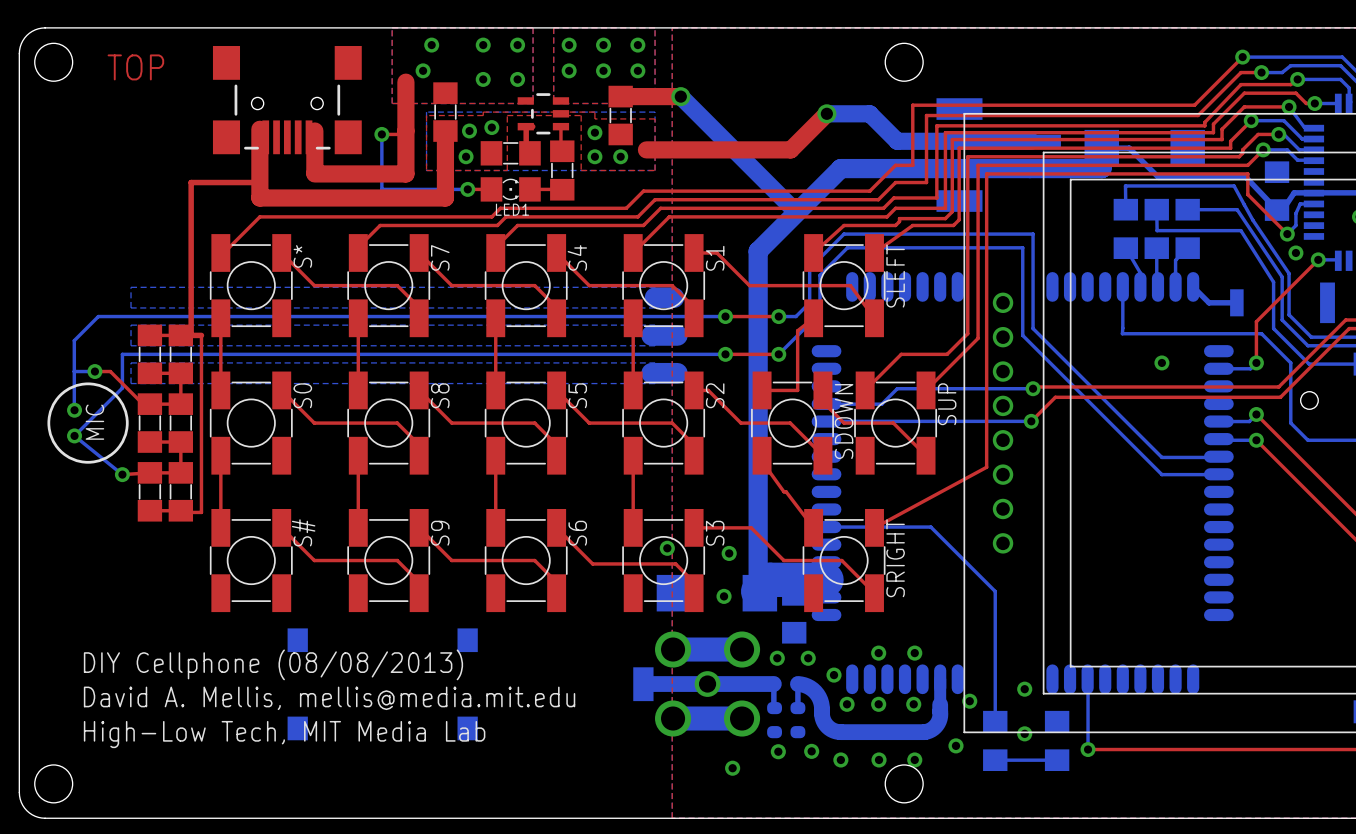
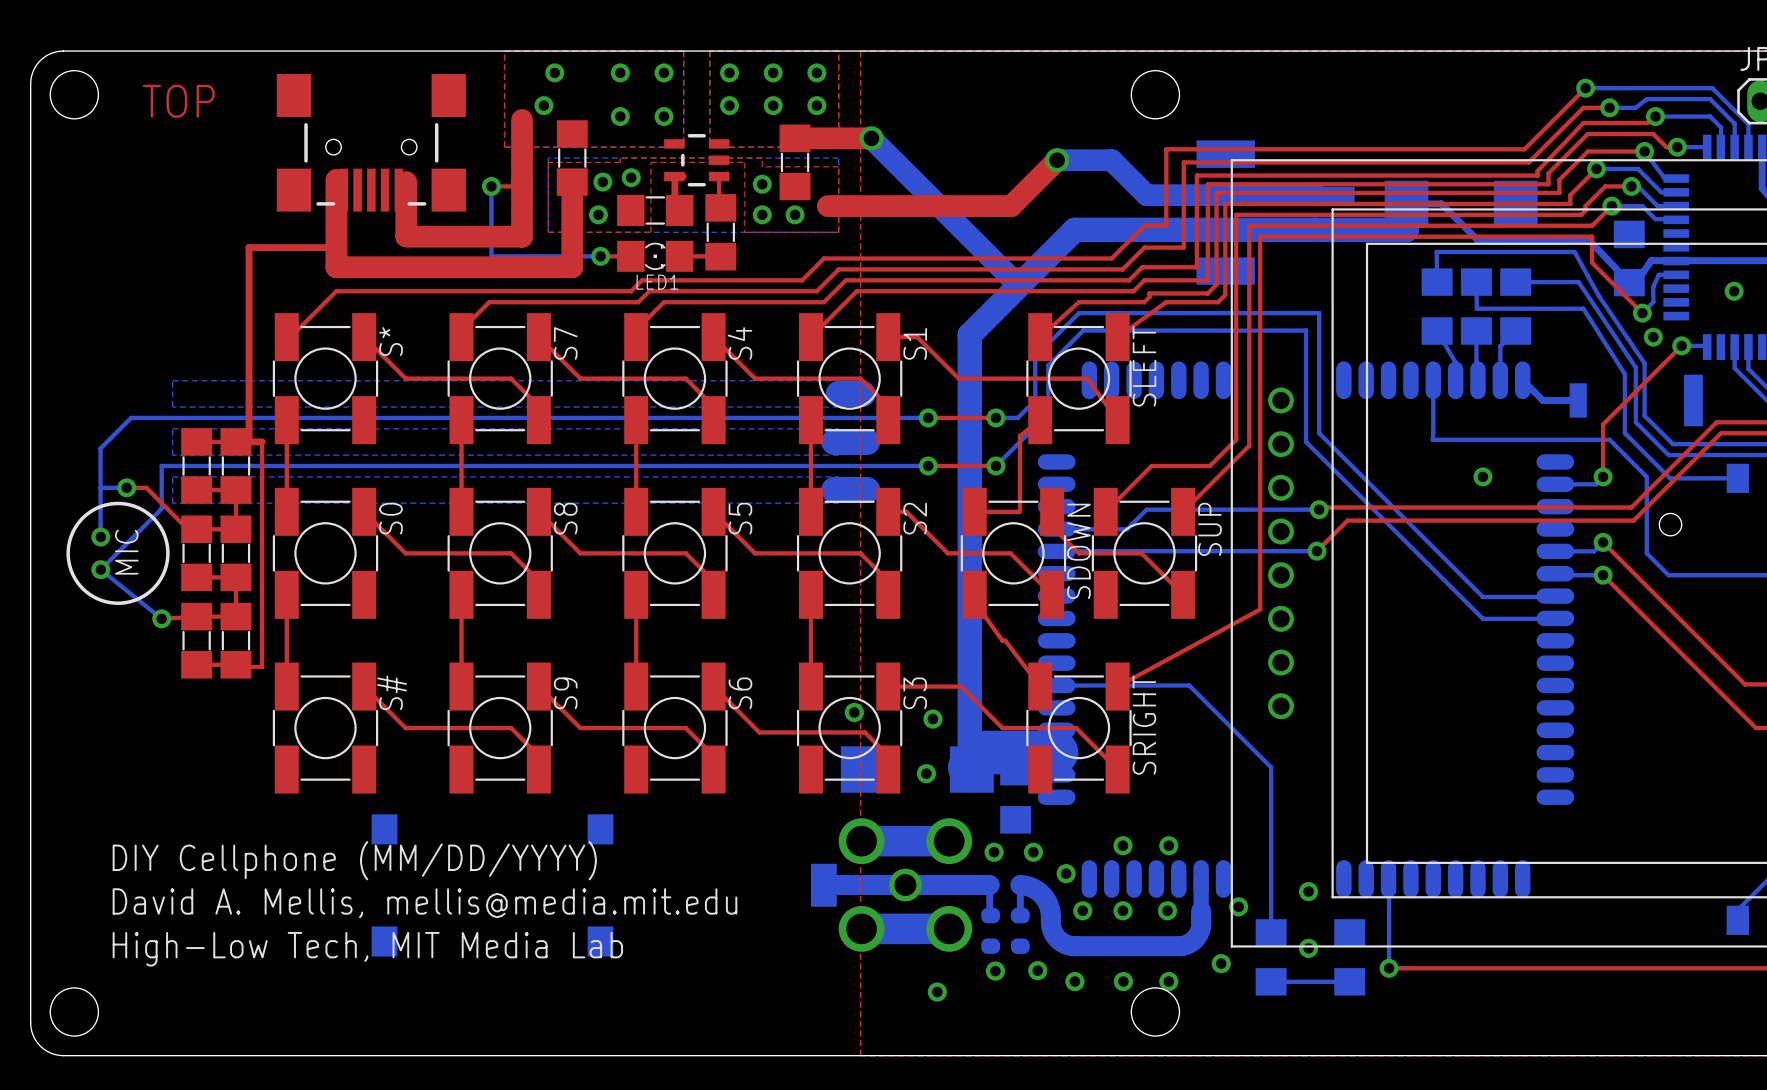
text: DIY Cellphone (08/08/2013) (273, 664) -> DIY Cellphone (MM/DD/YYYY) (354, 860)

